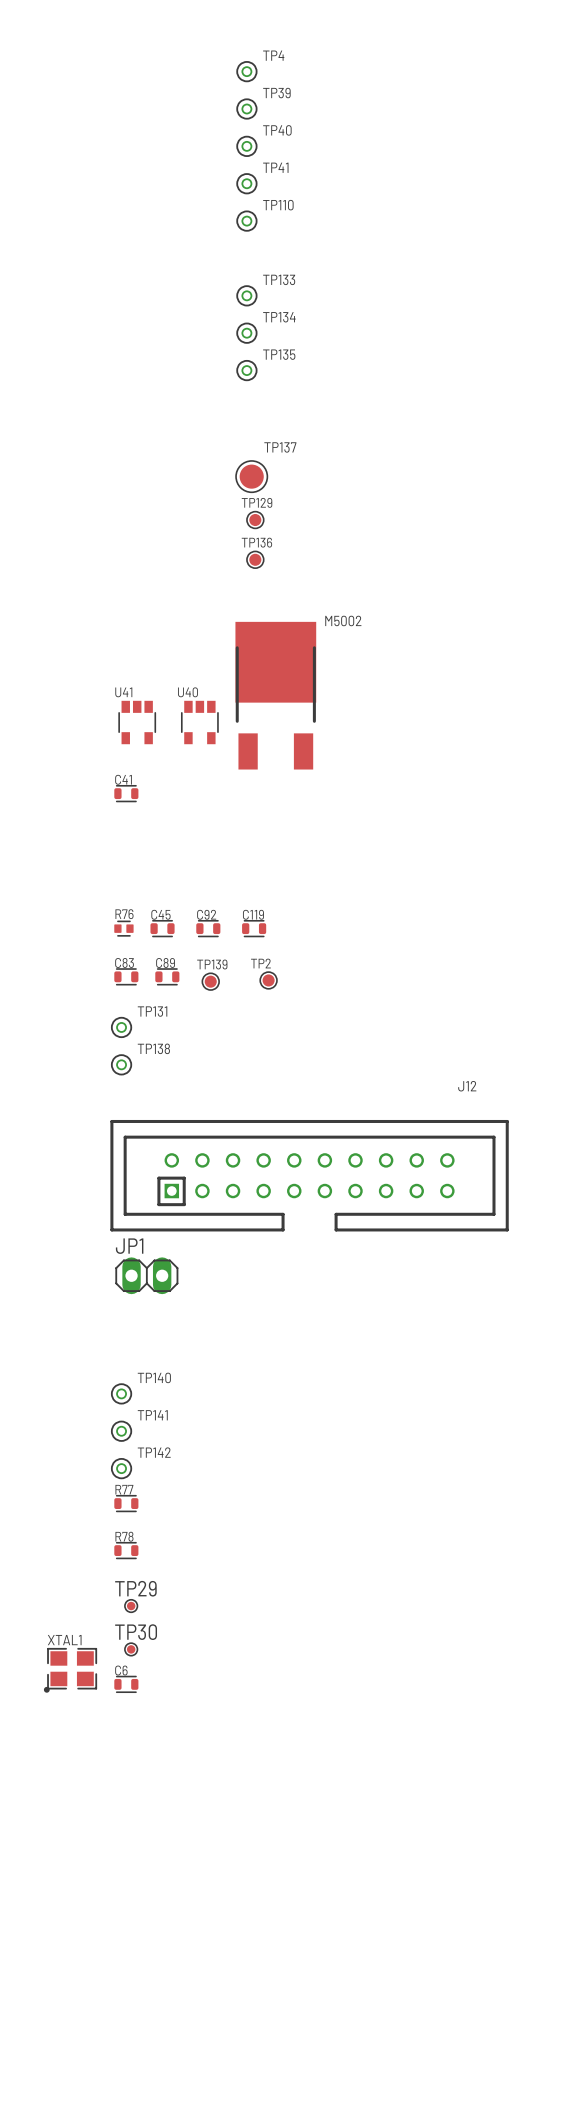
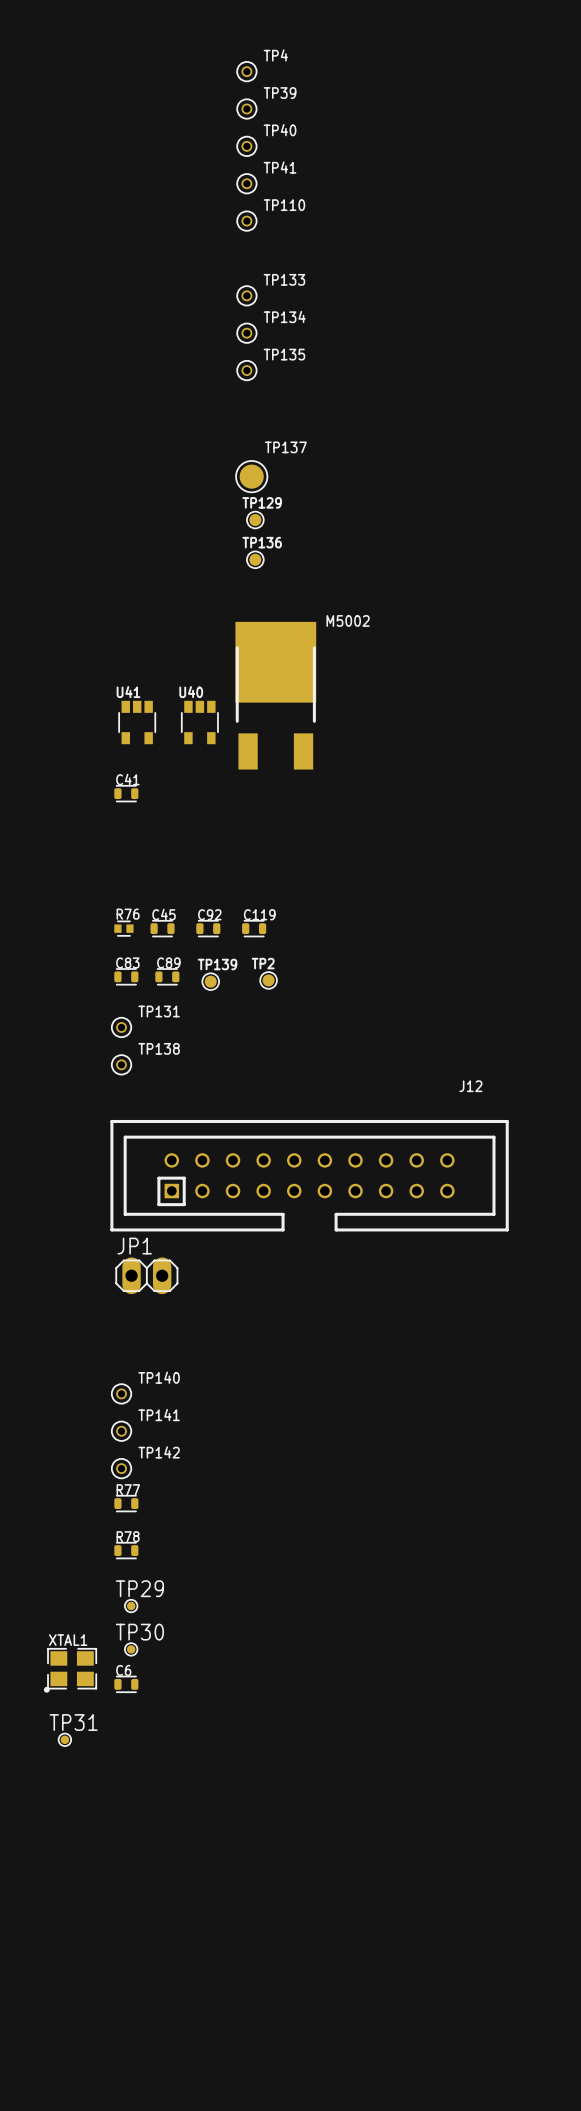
TP31: none -> (64, 1739)

